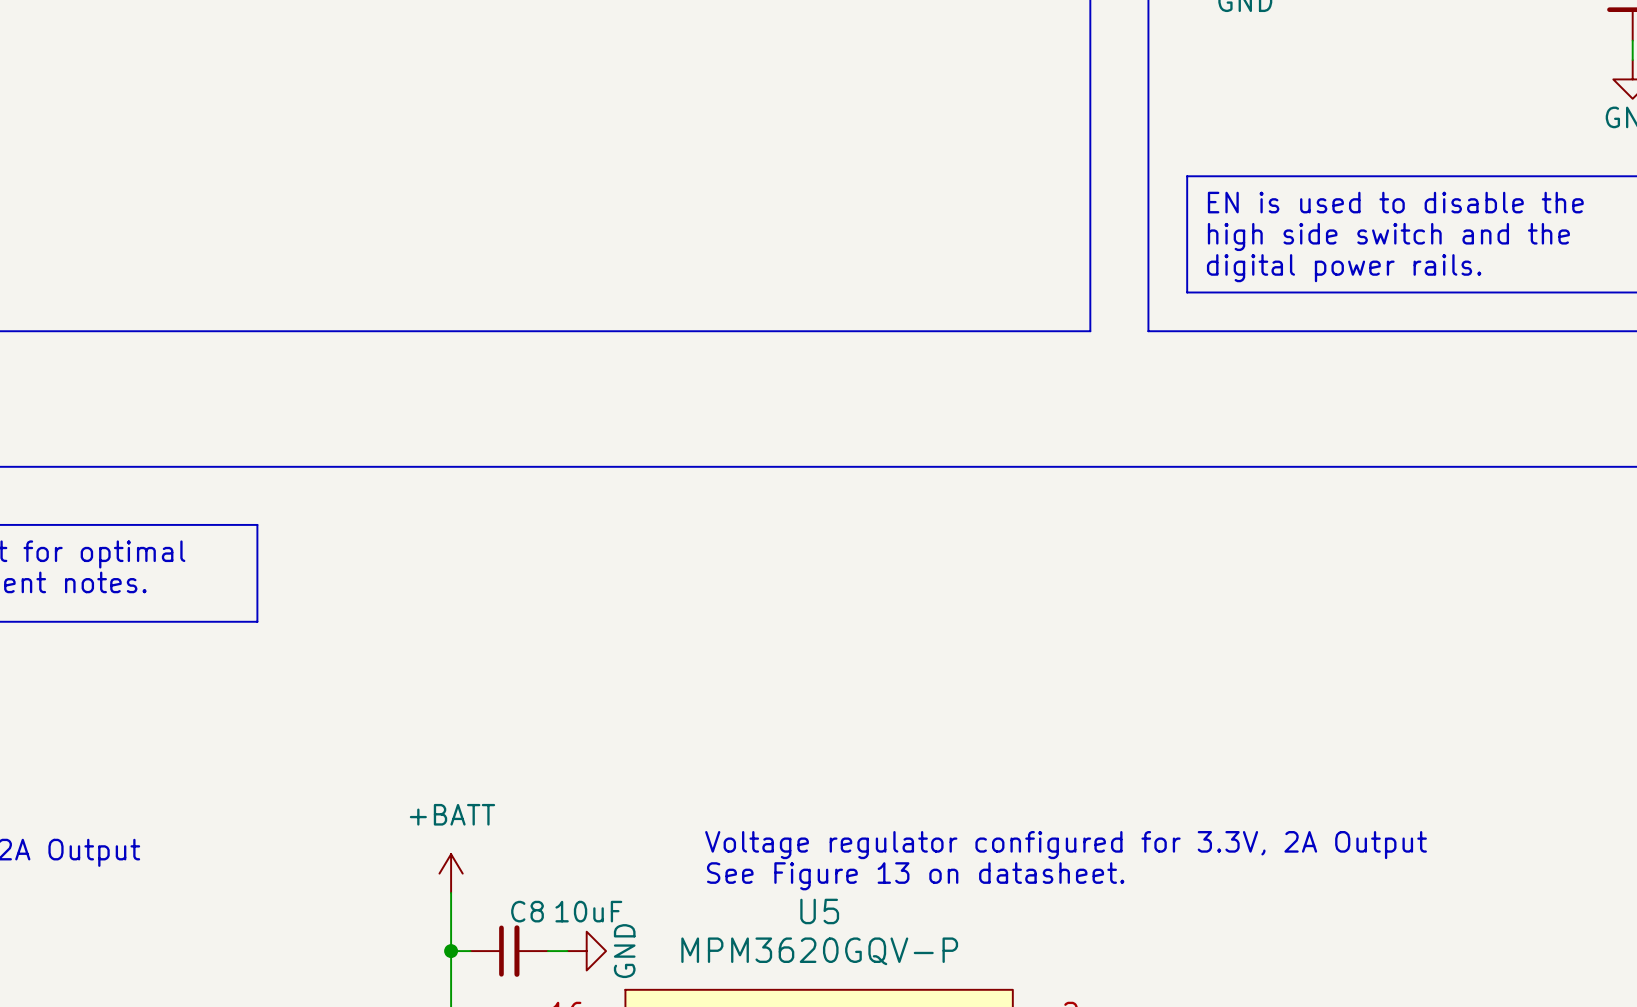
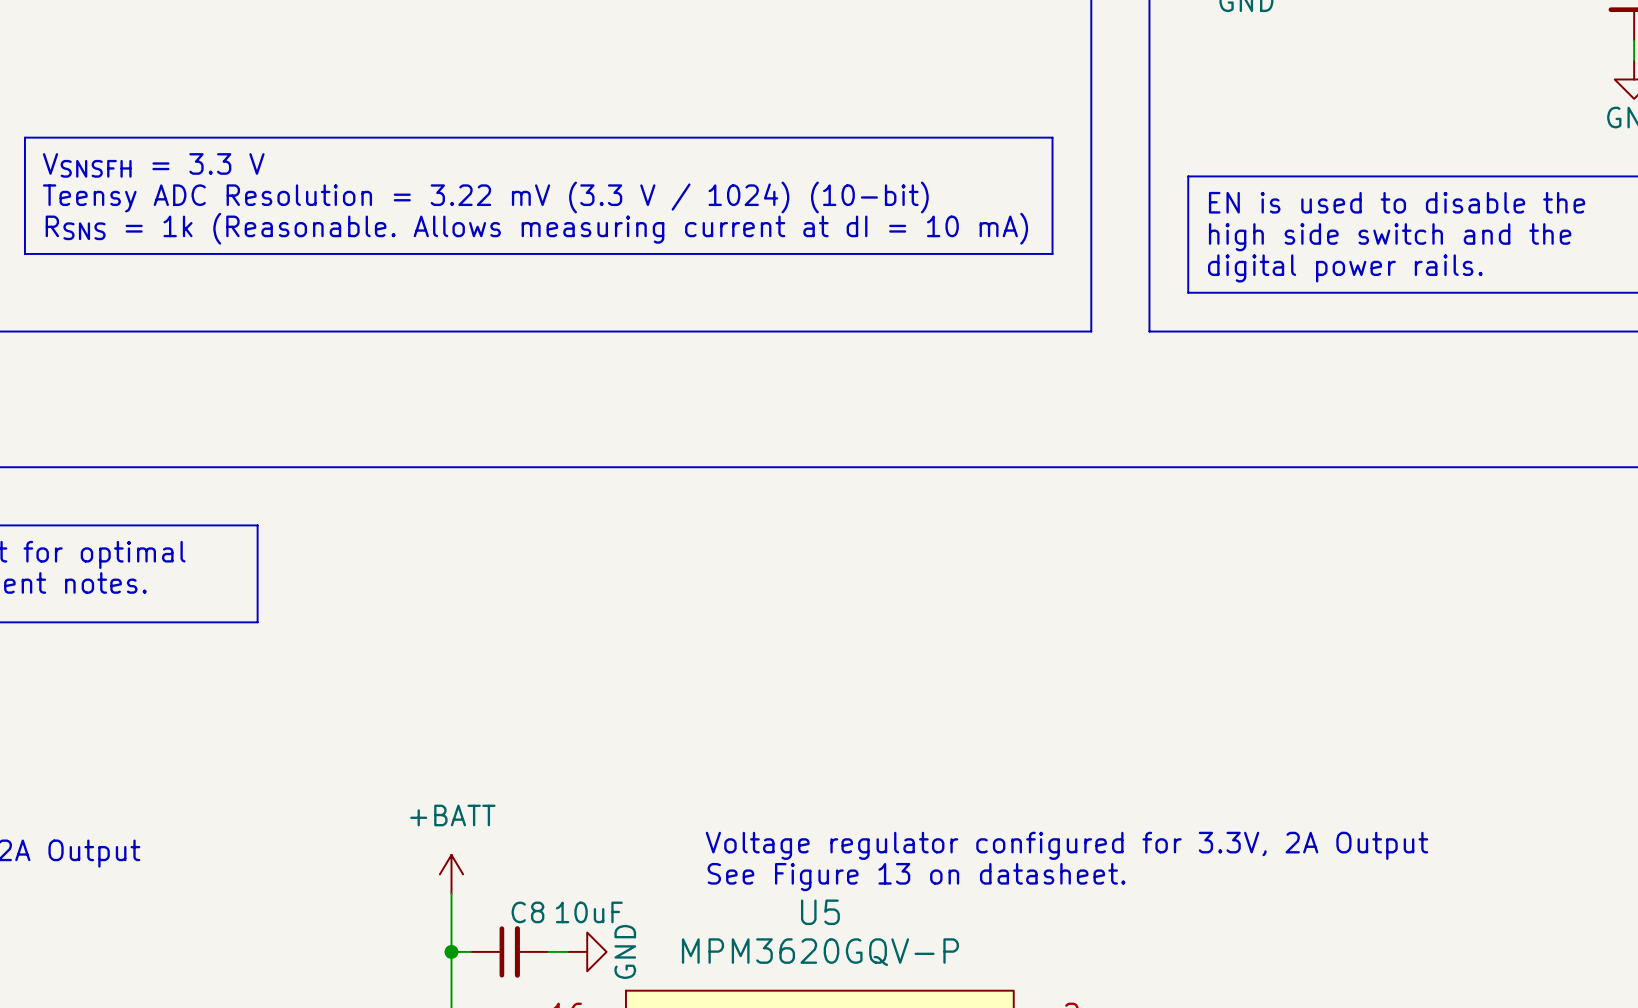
line: none -> (24, 137) (1052, 137) (1052, 253) (24, 253) (24, 137)
text: none -> VSNSFH = 3.3 V (153, 165)
text: none -> Teensy ADC Resolution = 3.22 mV (3.3 V / 1024) (10-bit) (485, 197)
text: none -> RSNS = 1k (Reasonable. Allows measuring current at dI = 10 mA) (536, 228)

